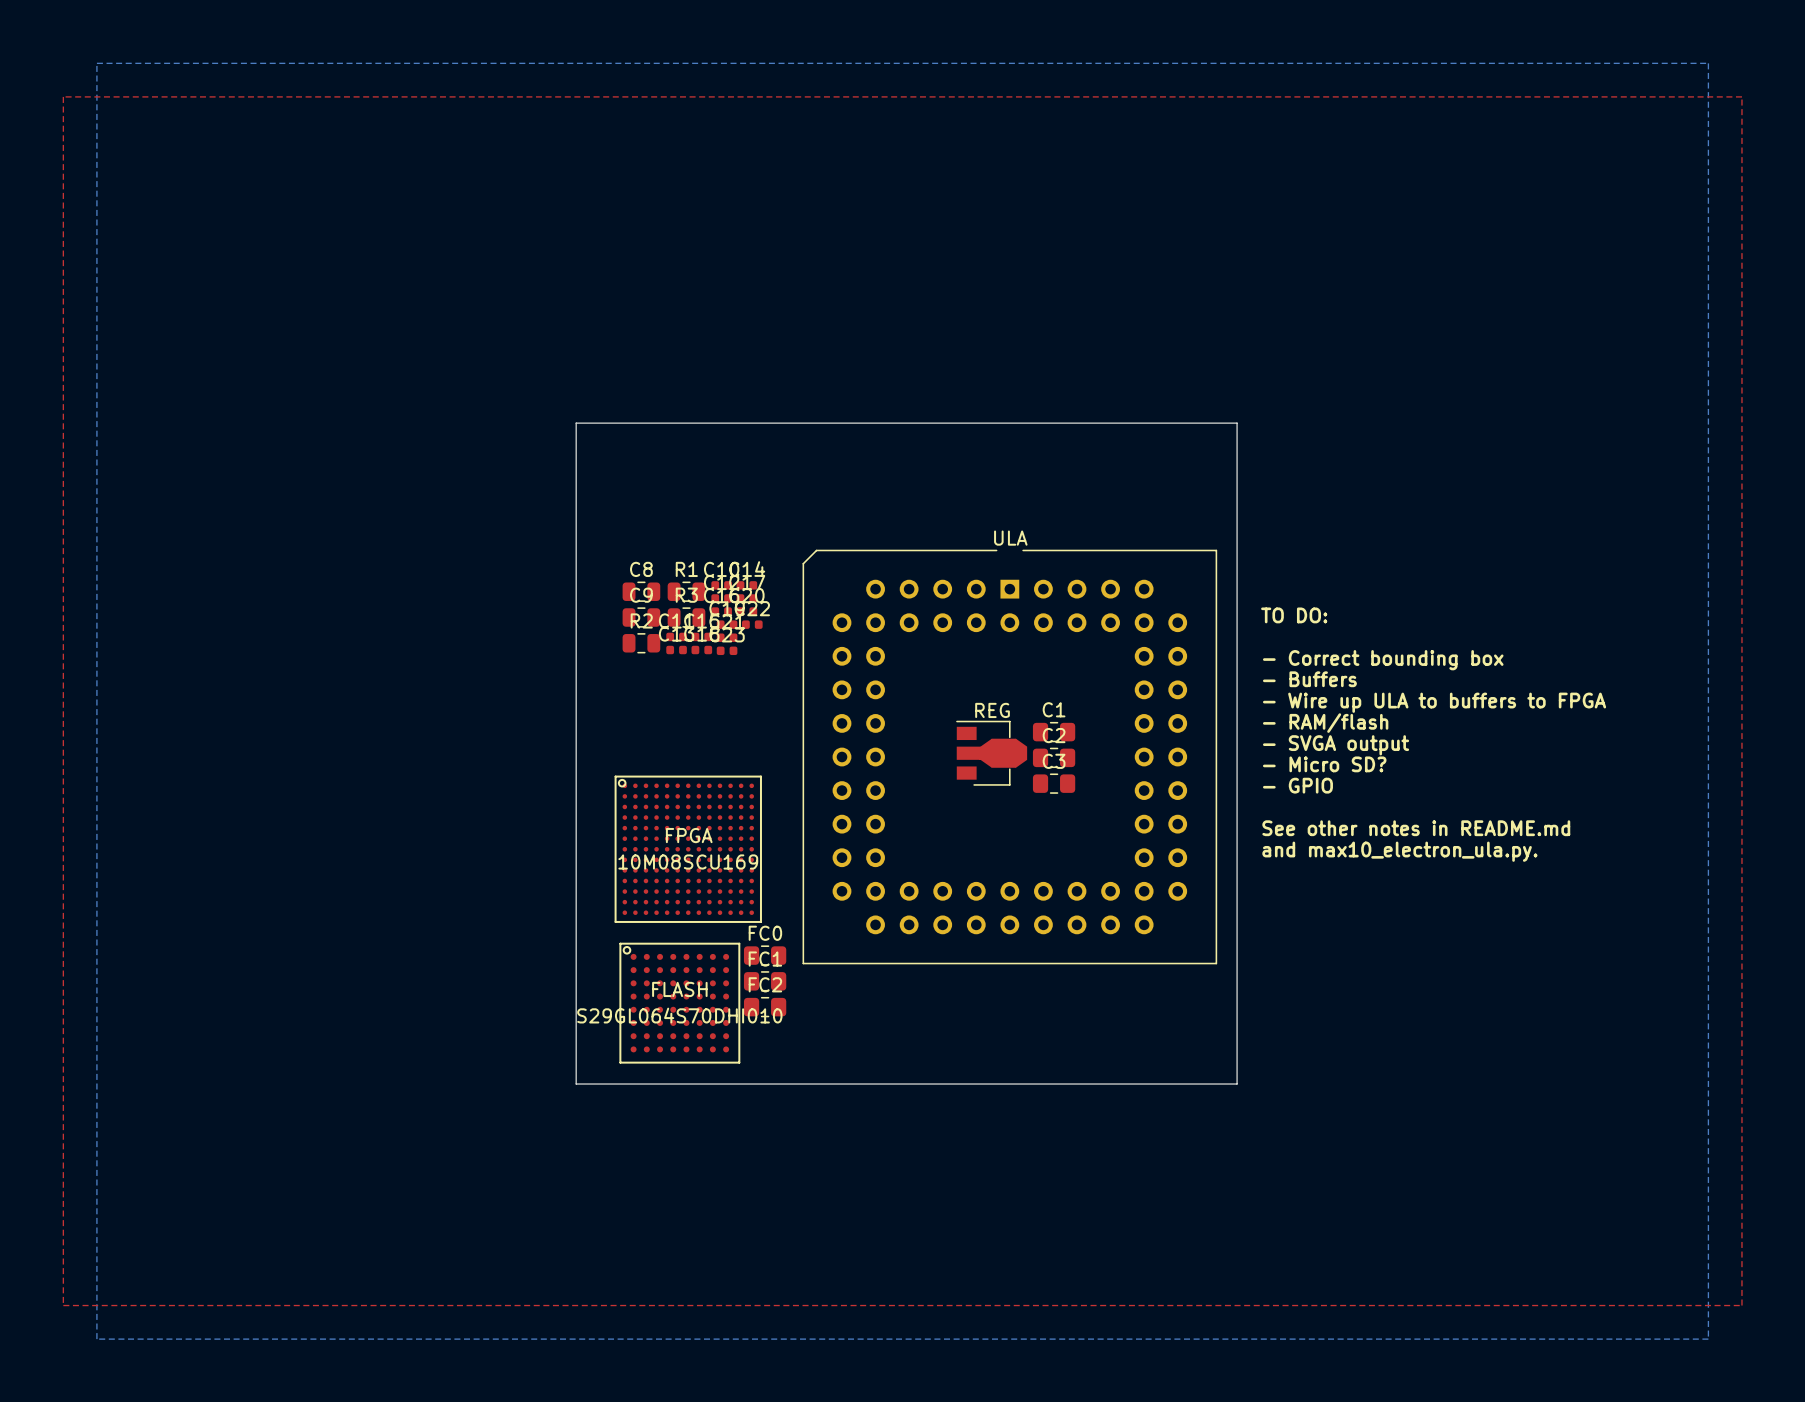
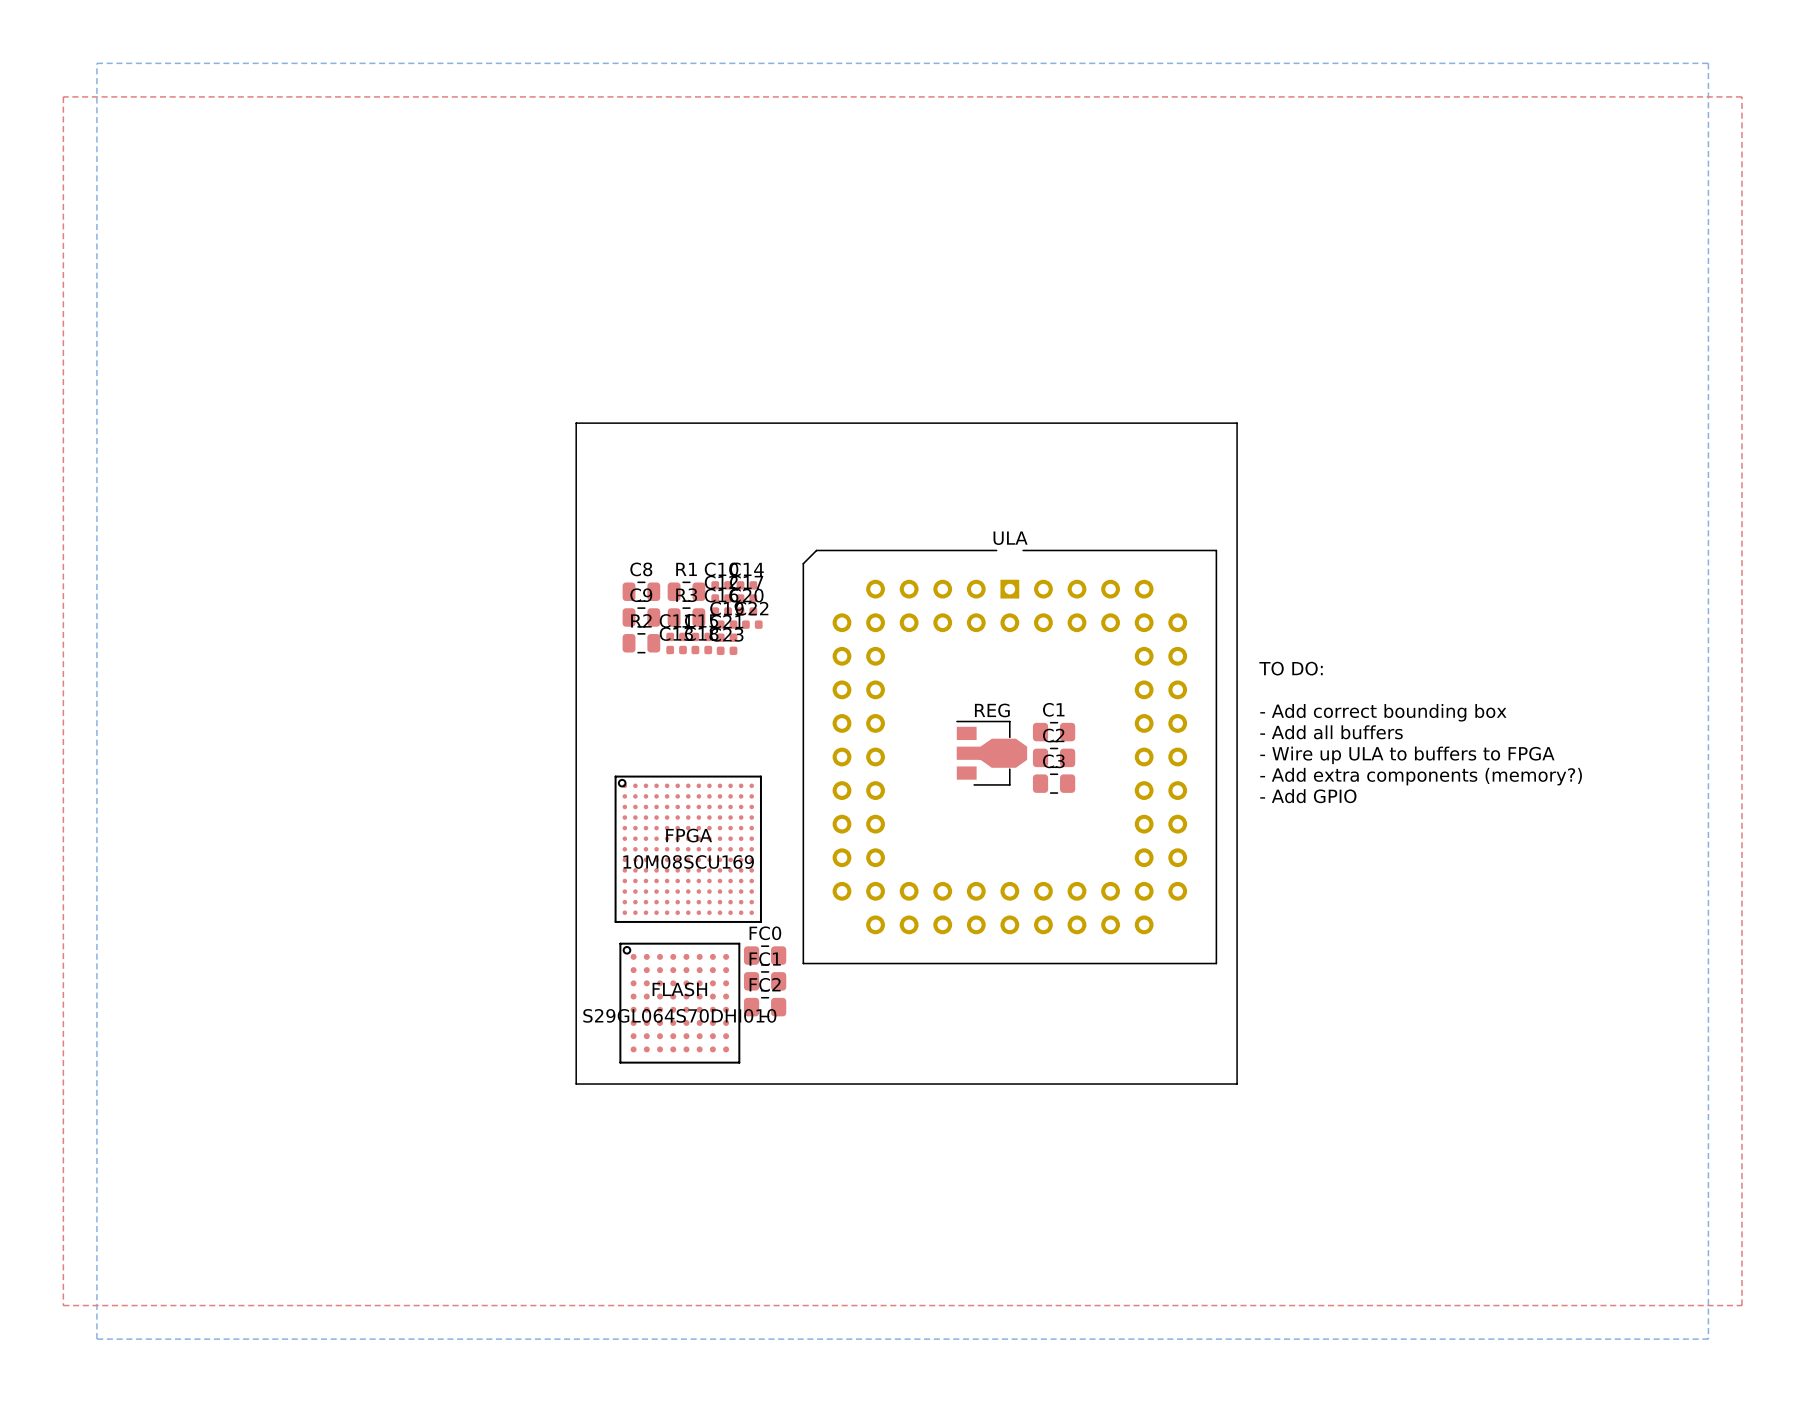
text position: TO DO: (1294, 615) -> TO DO: (1291, 668)
text: - Correct bounding box (1383, 660) -> none
text: - Buffers (1309, 679) -> none
text position: - Wire up ULA to buffers to FPGA (1434, 702) -> - Wire up ULA to buffers to FPGA (1407, 755)
text: none -> - Add correct bounding box (1383, 712)
text: - RAM/flash (1325, 723) -> none
text: none -> - Add all buffers (1331, 732)
text: - SVGA output (1336, 745) -> none
text: - Micro SD? (1324, 764) -> none
text: none -> - Add extra components (memory?) (1421, 776)
text: - GPIO (1297, 785) -> - Add GPIO (1308, 796)
text: See other notes in README.md (1416, 828) -> none
text: and max10_electron_ula.py. (1399, 851) -> none

